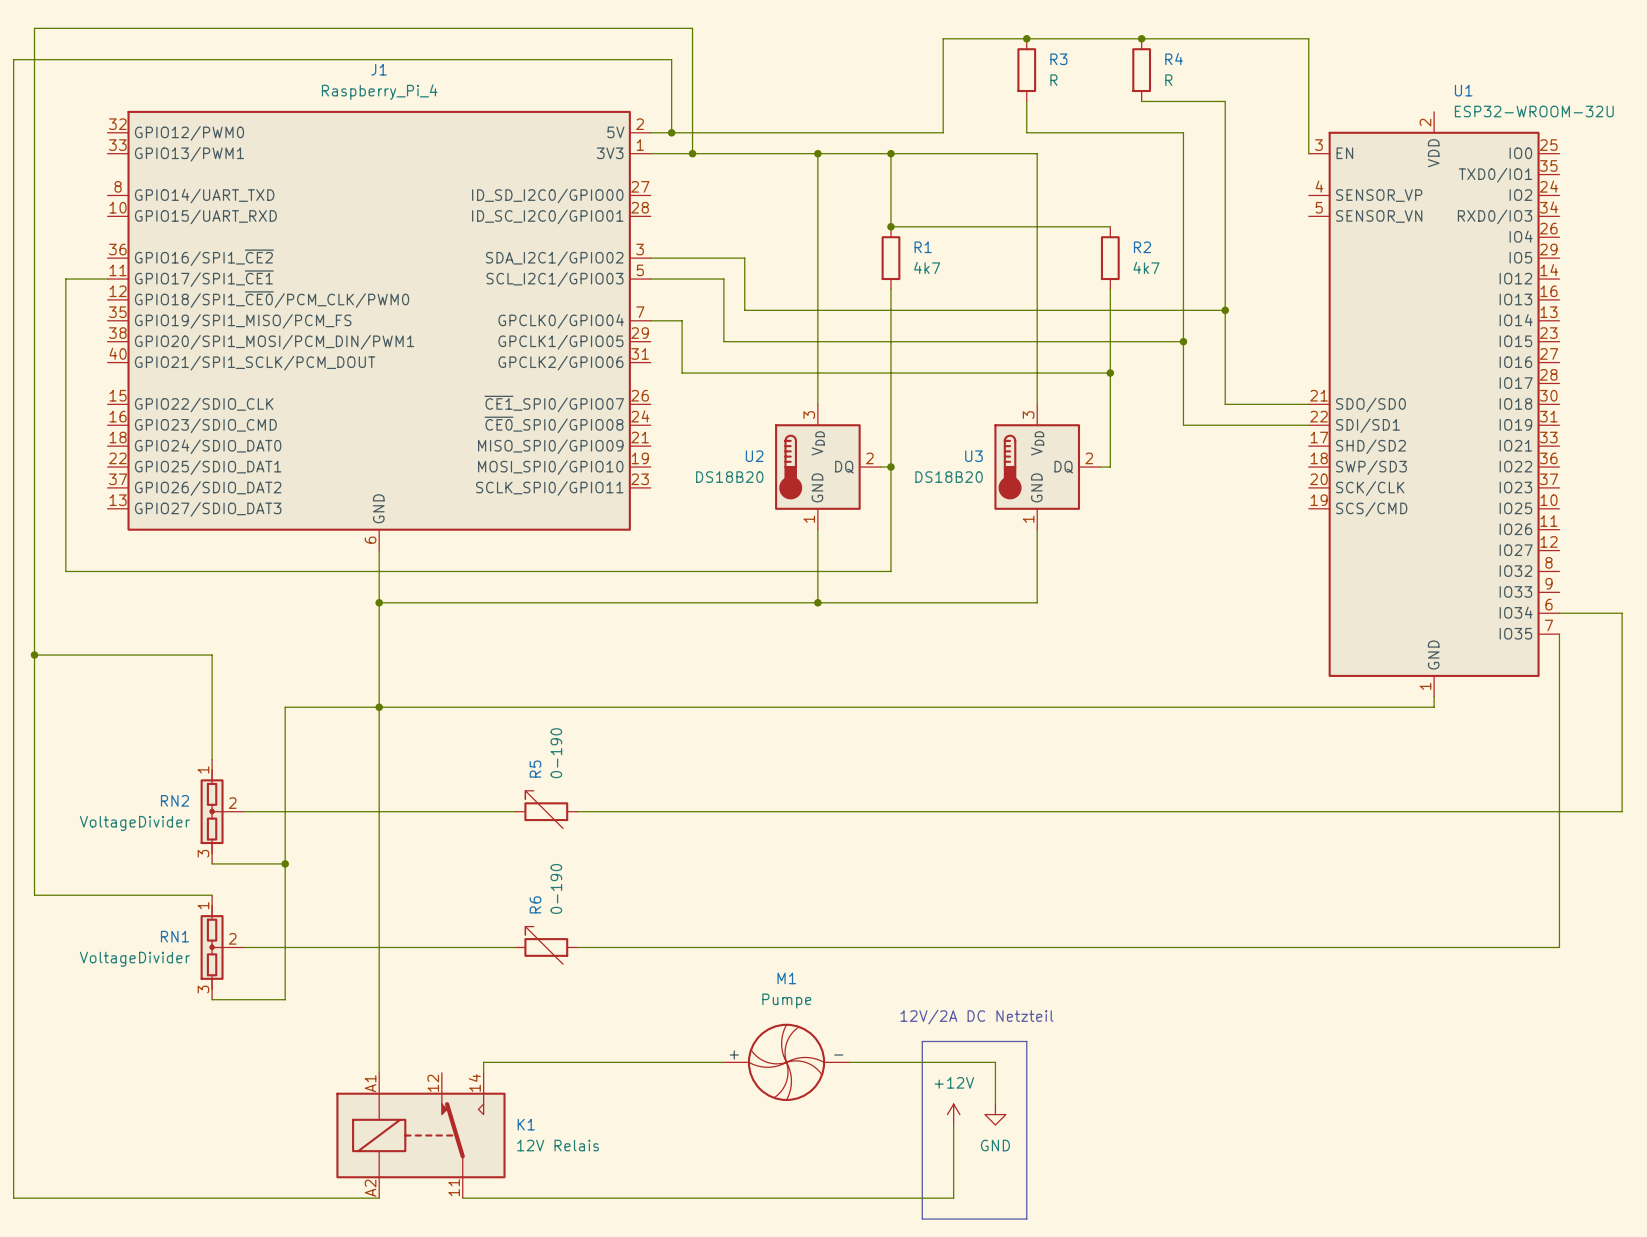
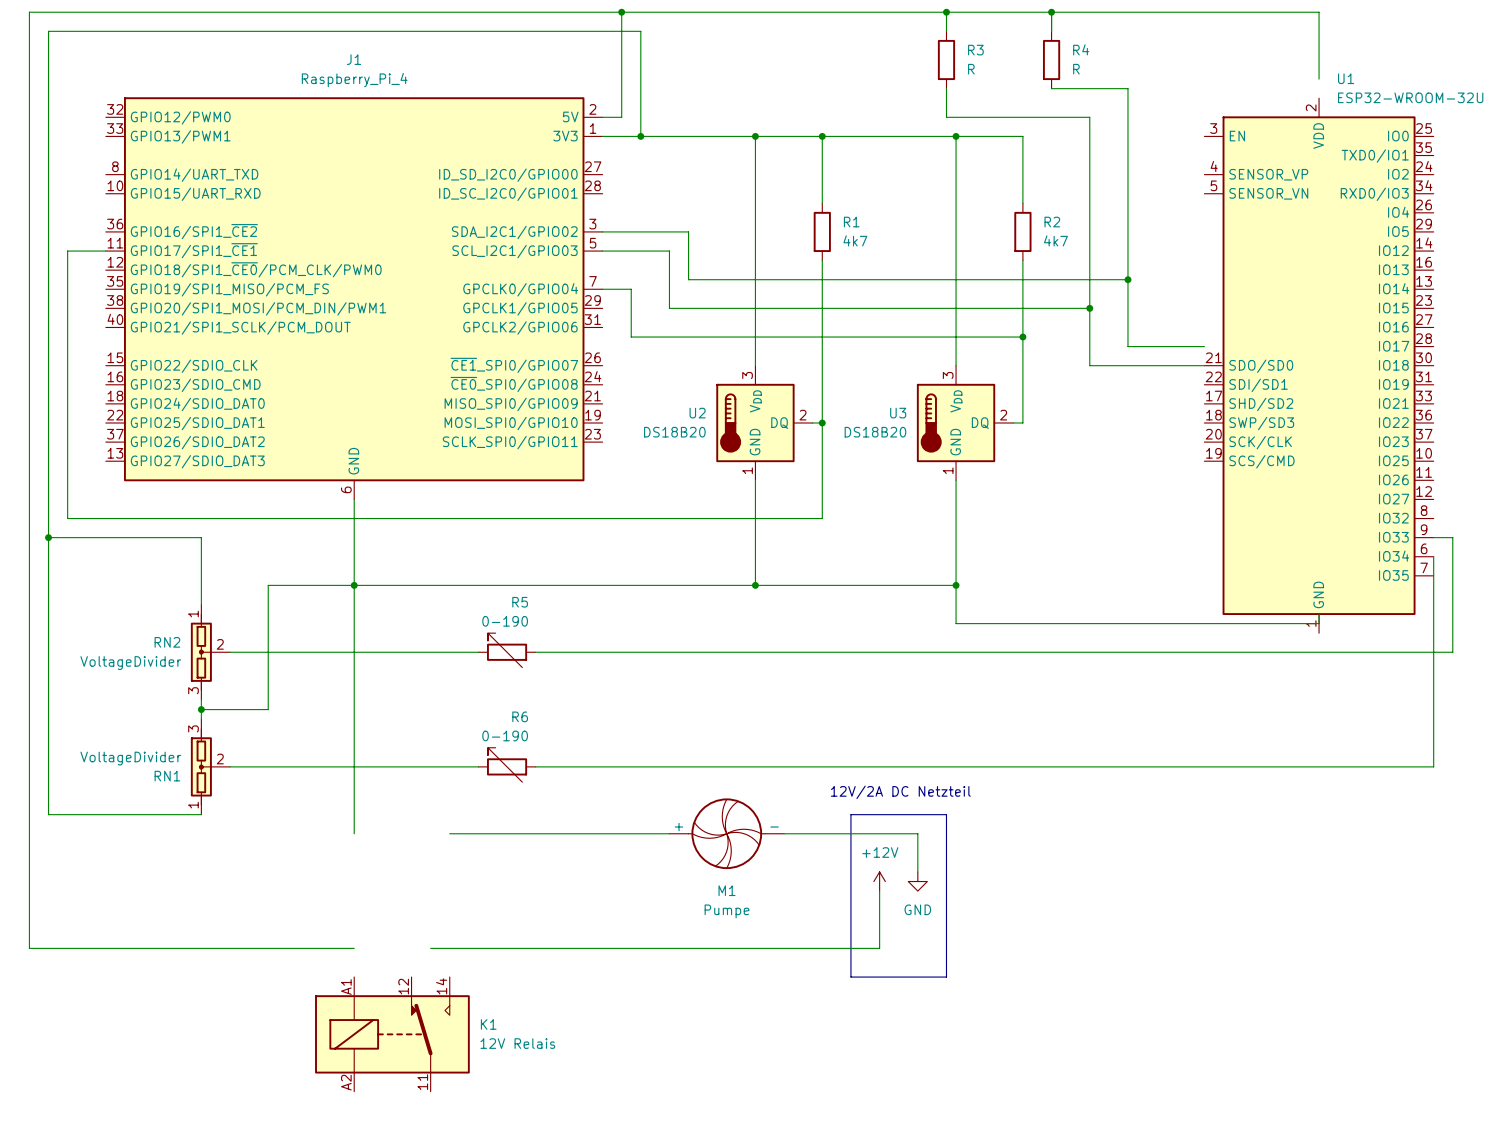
junction: none -> (621, 12)
wire: none -> (946, 12) (946, 31)
wire: none -> (1051, 12) (1051, 31)
wire: (692, 38) (692, 28) (34, 28) (34, 895) (44, 895) -> (640, 31) (48, 31) (48, 814)
junction position: (1026, 38) -> (946, 12)
junction position: (1141, 38) -> (1051, 12)
wire: (671, 59) (13, 59) (13, 1198) (379, 1198) -> (621, 50) (621, 12)
wire: none -> (1319, 79) (1319, 12) (29, 12) (29, 948) (354, 948)
wire: (671, 132) (943, 132) (943, 38) (1308, 38) (1308, 153) -> none
junction: (671, 132) -> none
junction: none -> (956, 136)
wire: (890, 226) (1110, 226) -> (956, 136) (1022, 136) (1022, 203)
junction: (890, 226) -> none
wire: (1225, 383) (1225, 404) -> (1089, 365) (1127, 365)
wire: none -> (1127, 346) (1204, 346)
wire: (1183, 404) (1183, 425) (1308, 425) -> none
junction: none -> (48, 537)
wire: none -> (1433, 537) (1452, 537) (1452, 652) (535, 652)
wire: (379, 602) (1037, 602) -> (1319, 614) (1319, 623) (956, 623) (956, 547)
junction: (379, 602) -> none
wire: none -> (755, 547) (755, 585)
junction position: (817, 602) -> (755, 585)
wire: (1559, 613) (1622, 613) (1622, 811) (577, 811) -> (1433, 556) (1433, 575)
junction: none -> (354, 585)
junction: none -> (956, 585)
wire: (34, 655) (212, 655) -> (48, 537) (201, 537) (201, 594)
junction: (34, 655) -> none
wire: (1434, 696) (1434, 707) (285, 707) -> (956, 585) (268, 585) (268, 642)
junction: (379, 707) -> none
wire: none -> (230, 652) (478, 652)
R5 value rotation: 0° (556, 753) -> 90° clockwise (505, 621)
R5 name rotation: 0° (535, 769) -> 90° clockwise (520, 602)
junction: none -> (201, 709)
wire: (285, 780) (285, 999) (212, 999) -> (268, 709) (201, 709)
R5 position: (546, 809) -> (507, 650)
RN2 position: (222, 811) -> (210, 652)
wire: (243, 811) (514, 811) -> (230, 766) (478, 766)
wire: (1559, 843) (1559, 947) (577, 947) -> (1433, 766) (535, 766)
wire: (212, 863) (285, 863) -> none
junction: (285, 863) -> none
R6 value rotation: 0° (556, 888) -> 90° clockwise (505, 735)
R6 name rotation: 0° (535, 904) -> 90° clockwise (520, 716)
wire: (379, 916) (379, 1072) -> none
wire: none -> (449, 833) (669, 833)
R6 position: (546, 945) -> (507, 764)
RN1 flip: as is (212, 947) -> up-down (201, 766)
RN1 position: (222, 947) -> (210, 766)
wire: (243, 947) (514, 947) -> none
wire: none -> (879, 891) (879, 948) (430, 948)
text position: 12V/2A DC Netzteil (976, 1017) -> 12V/2A DC Netzteil (900, 792)
line: (922, 1041) (1026, 1041) -> (850, 948) (850, 814) (946, 814) (946, 948)
wire: (723, 1062) (483, 1062) (483, 1072) -> none
M1 position: (786, 1062) -> (726, 833)
wire: (849, 1062) (995, 1062) (995, 1104) -> (784, 833) (917, 833) (917, 871)
line: (922, 1072) (922, 1219) (1026, 1219) (1026, 1072) -> (850, 977) (946, 977)
power symbol position: +12V (953, 1114) -> +12V (879, 881)
power symbol position: GND (995, 1114) -> GND (917, 881)
wire: (953, 1125) (953, 1198) (462, 1198) -> none

